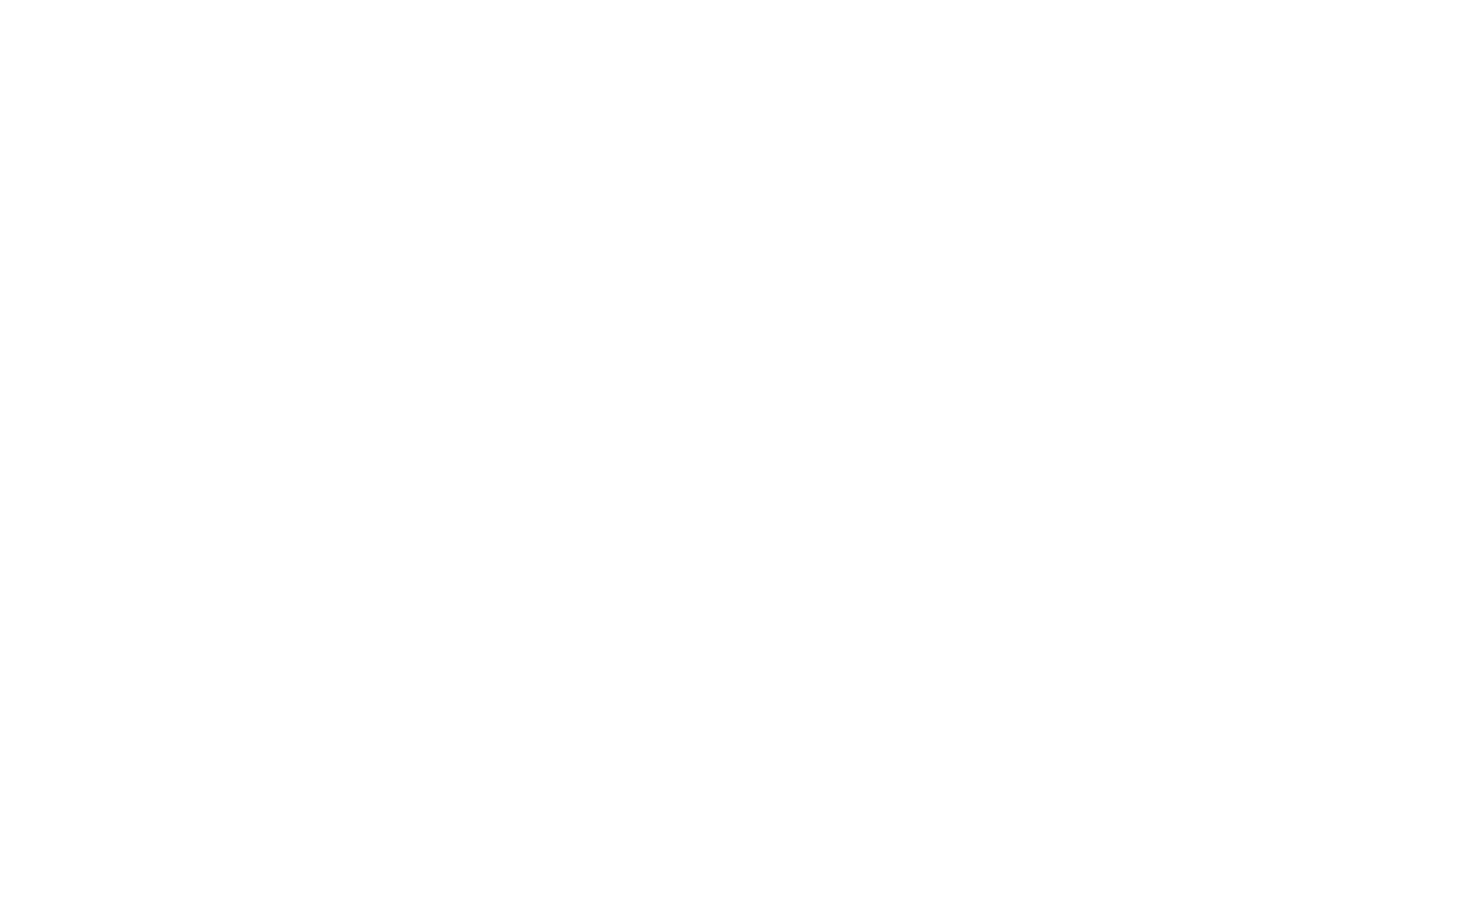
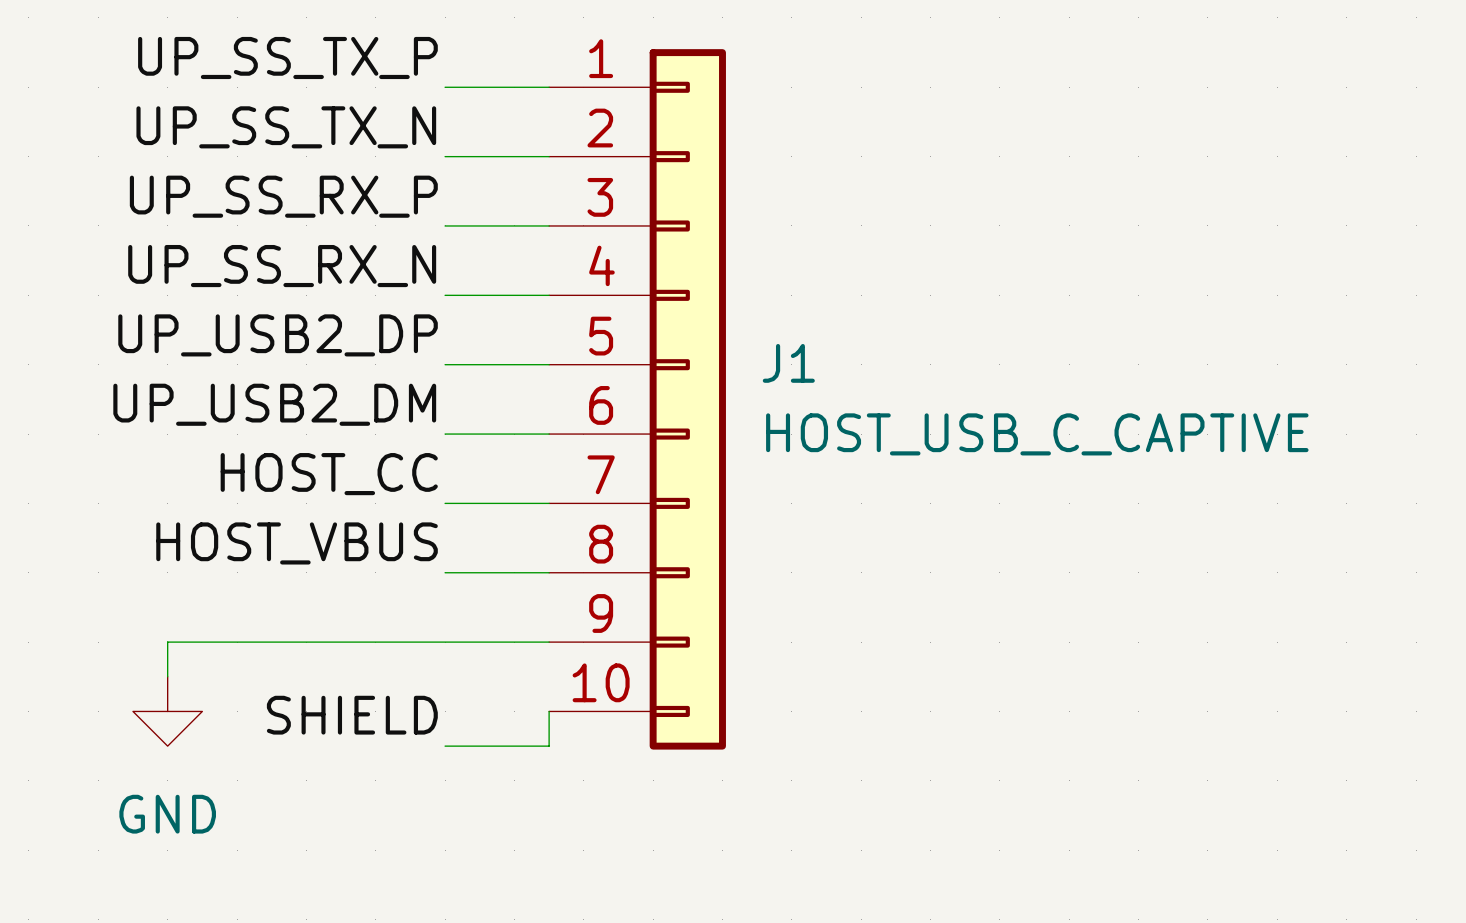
label: none -> UP_SS_TX_P (287, 57)
wire: none -> (445, 87) (549, 87)
label: none -> UP_SS_TX_N (286, 127)
wire: none -> (445, 156) (549, 156)
label: none -> UP_SS_RX_P (283, 196)
wire: none -> (445, 225) (549, 225)
label: none -> UP_SS_RX_N (282, 266)
wire: none -> (445, 295) (549, 295)
label: none -> UP_USB2_DP (278, 335)
wire: none -> (445, 364) (549, 364)
J1: none -> HOST_USB_C_CAPTIVE (637, 399)
label: none -> UP_USB2_DM (274, 404)
wire: none -> (445, 434) (549, 434)
label: none -> HOST_CC (329, 474)
wire: none -> (445, 503) (549, 503)
label: none -> HOST_VBUS (297, 543)
wire: none -> (445, 572) (549, 572)
wire: none -> (549, 642) (167, 642) (167, 676)
power symbol: none -> GND (167, 711)
wire: none -> (549, 711) (549, 746) (445, 746)
label: none -> SHIELD (352, 715)

